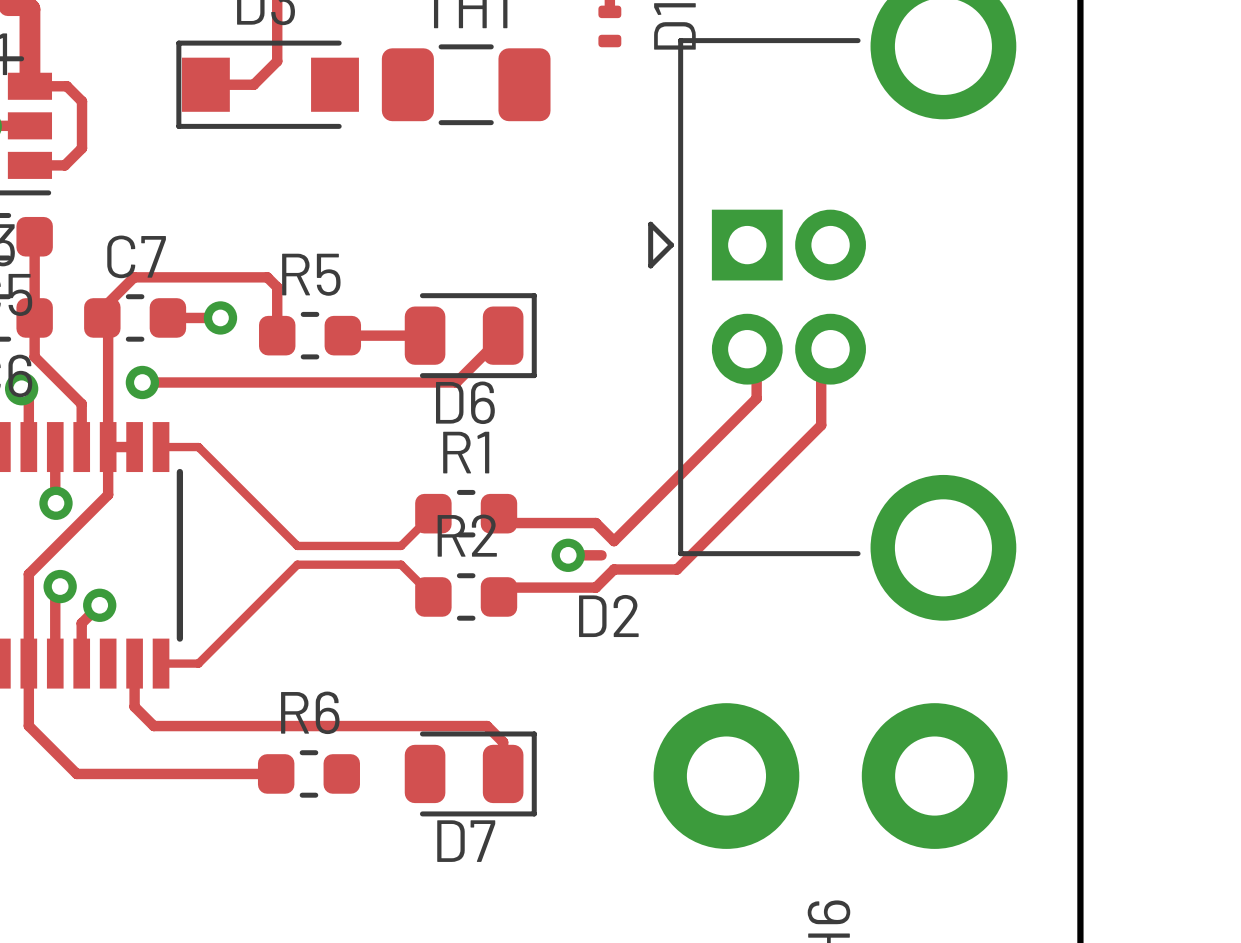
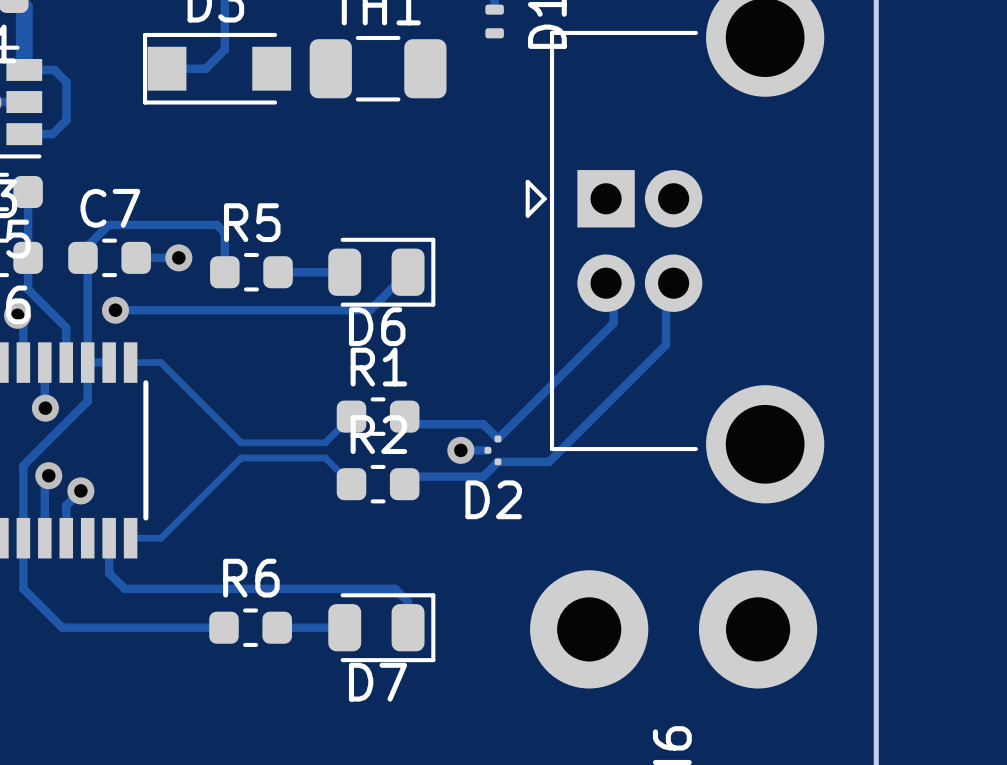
track: none -> (277, 627) (344, 627)

